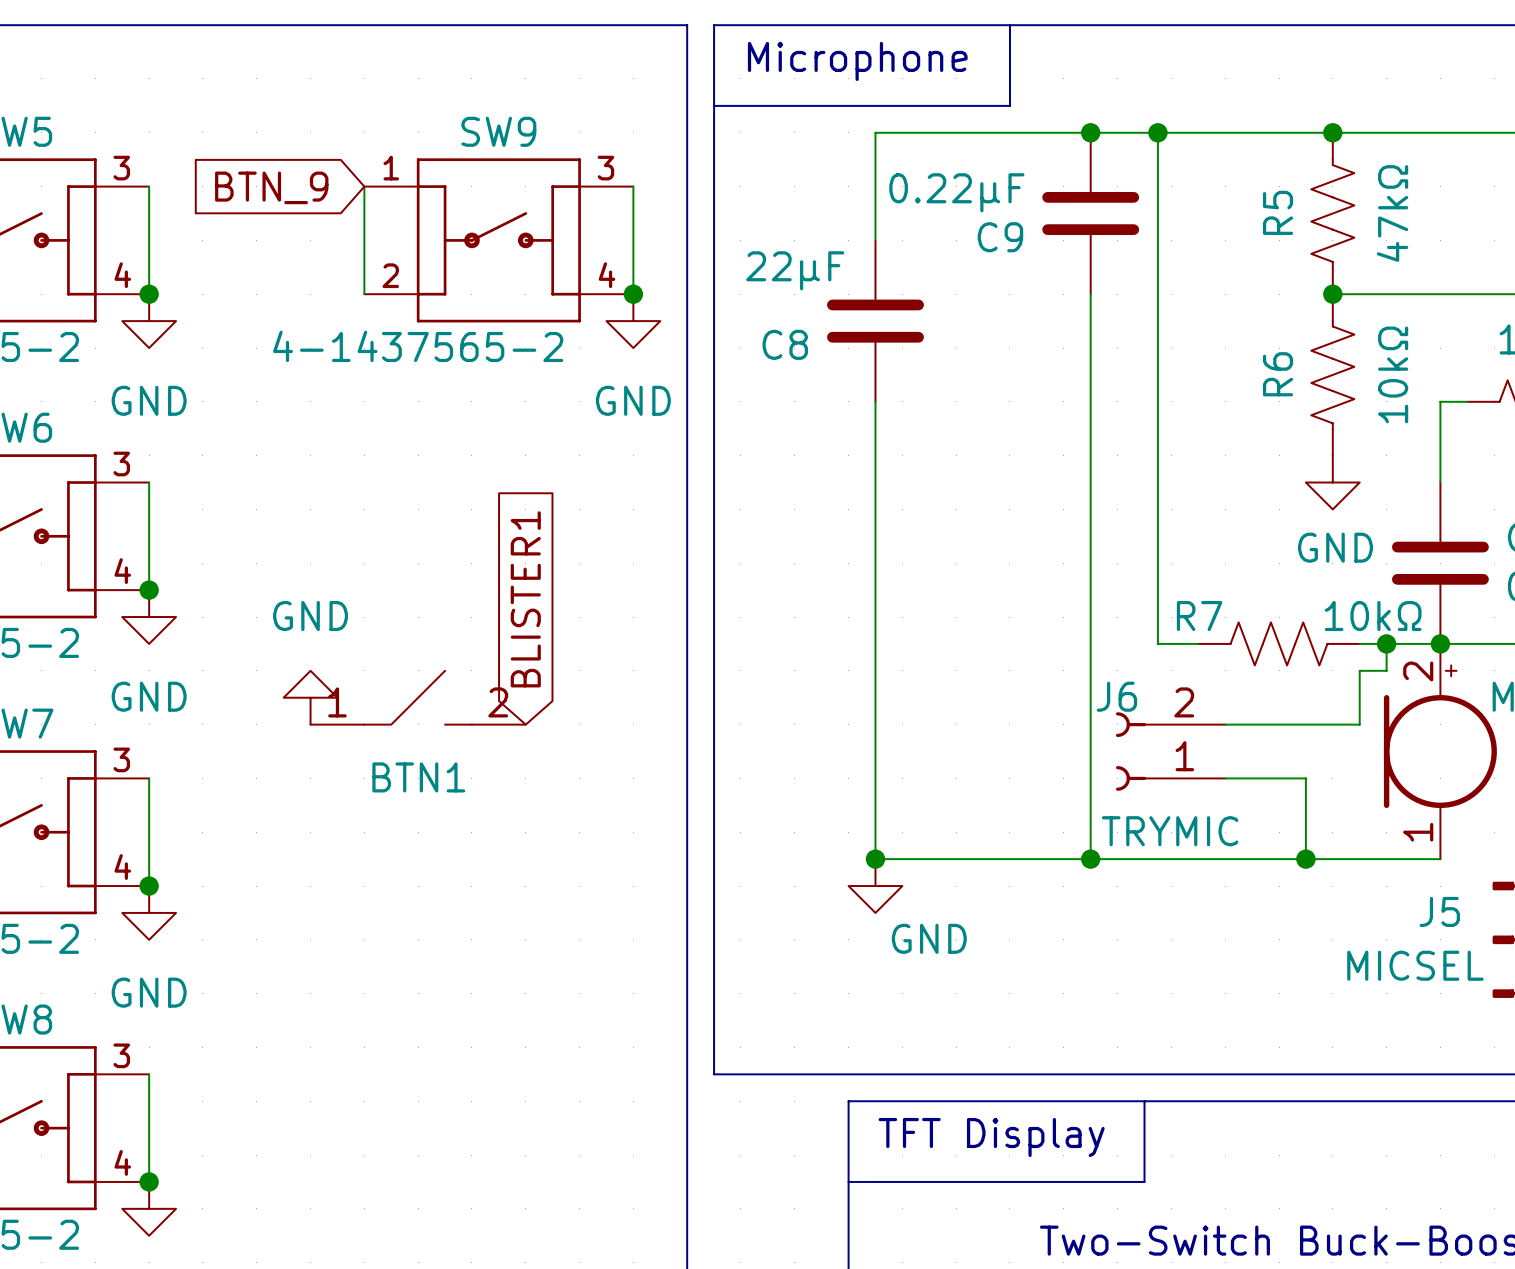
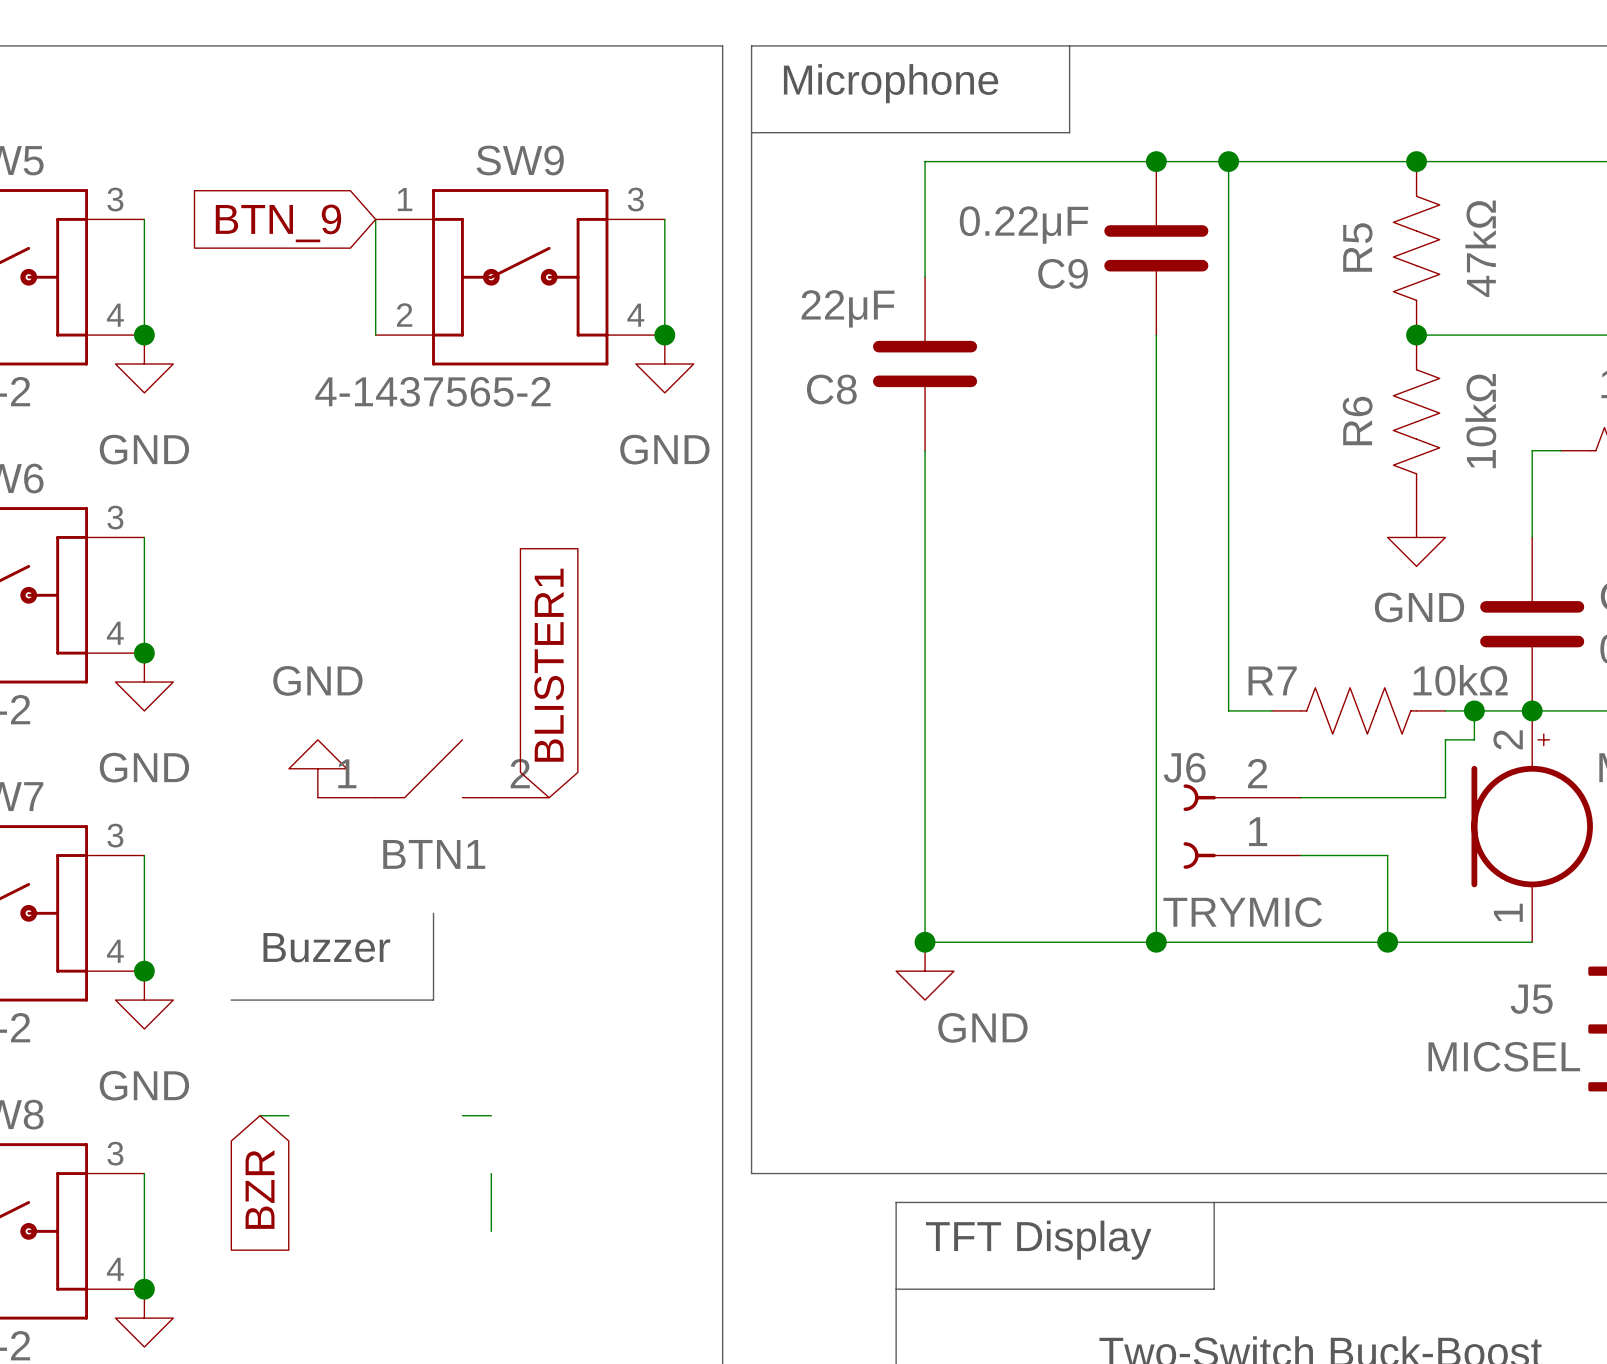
line: none -> (433, 913) (433, 1000) (231, 1000)
text: none -> Buzzer (326, 947)
wire: none -> (260, 1115) (288, 1115)
wire: none -> (462, 1115) (491, 1115)
wire: none -> (491, 1173) (491, 1231)
global label: none -> BZR (260, 1189)

